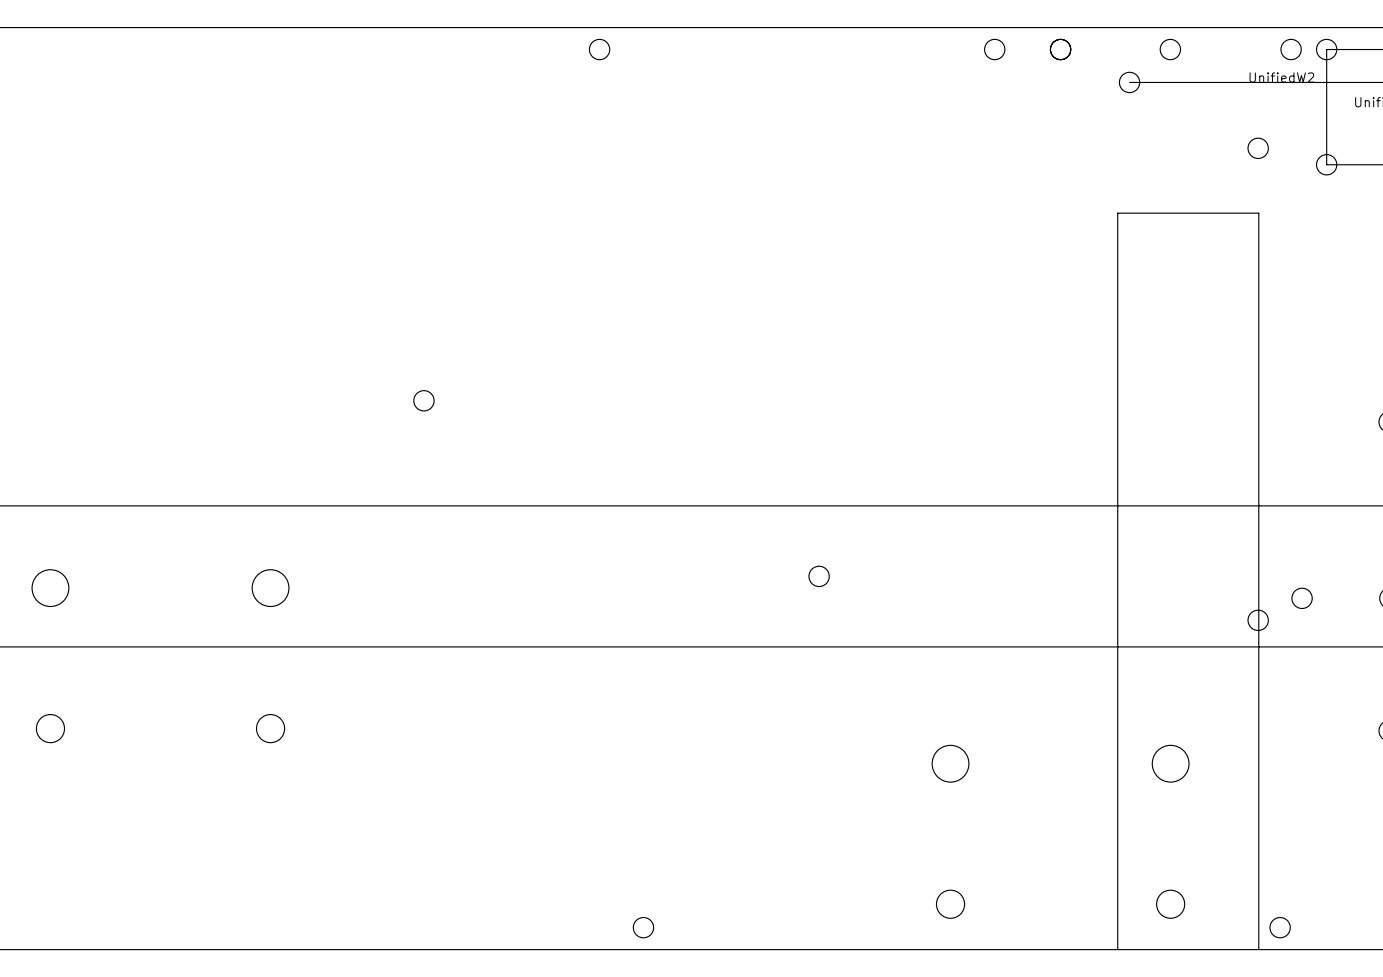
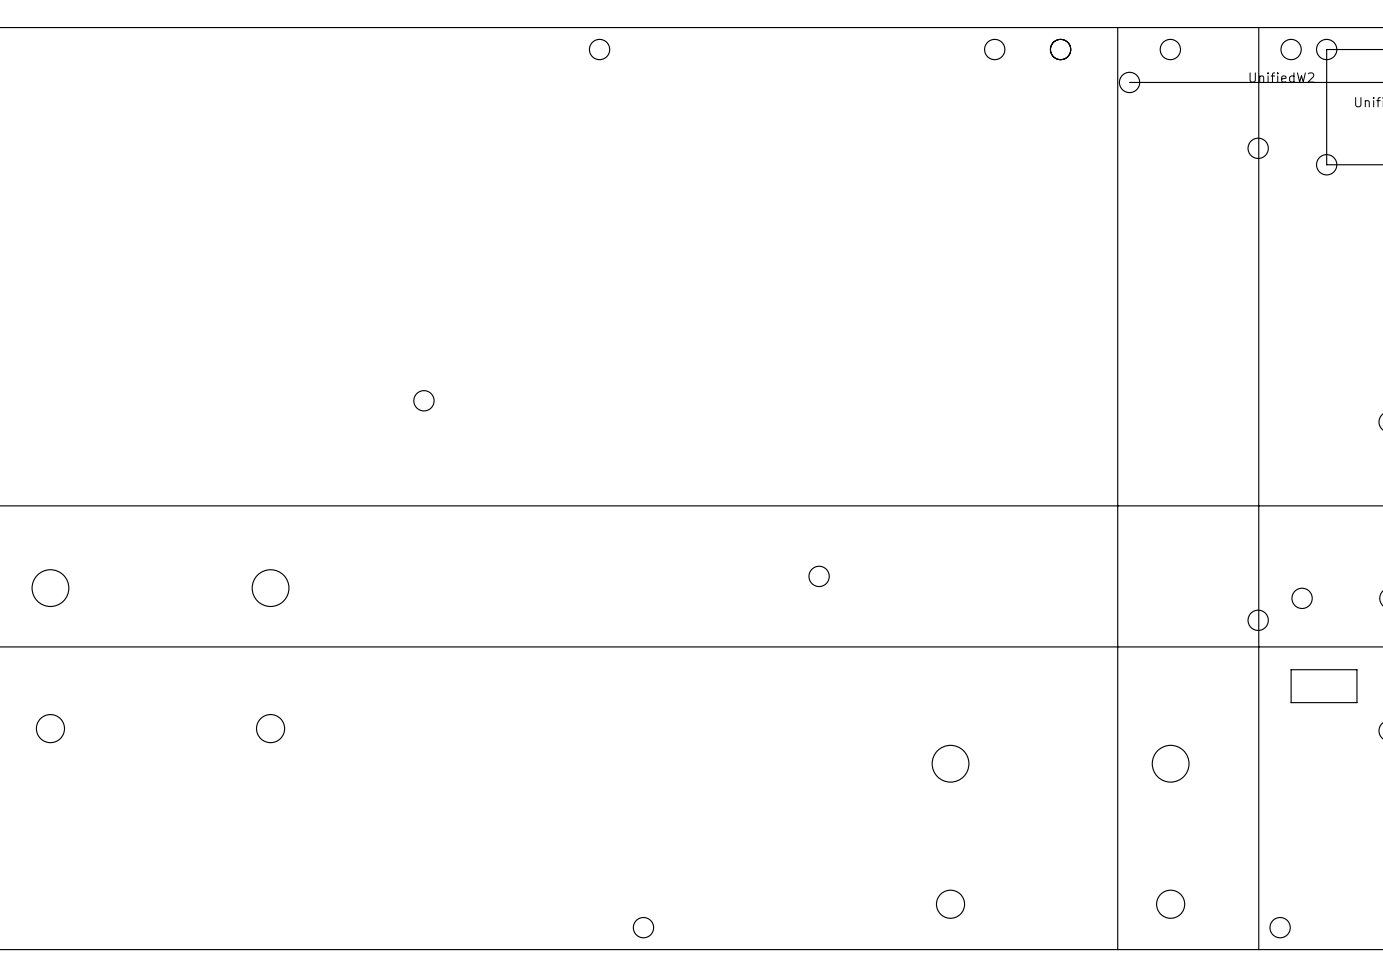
line: none -> (1117, 27) (1117, 213)
line: (1117, 213) (1258, 213) -> (1258, 27) (1258, 213)
board edge: none -> (1291, 669) (1356, 669) (1356, 702) (1291, 702) (1291, 669)

